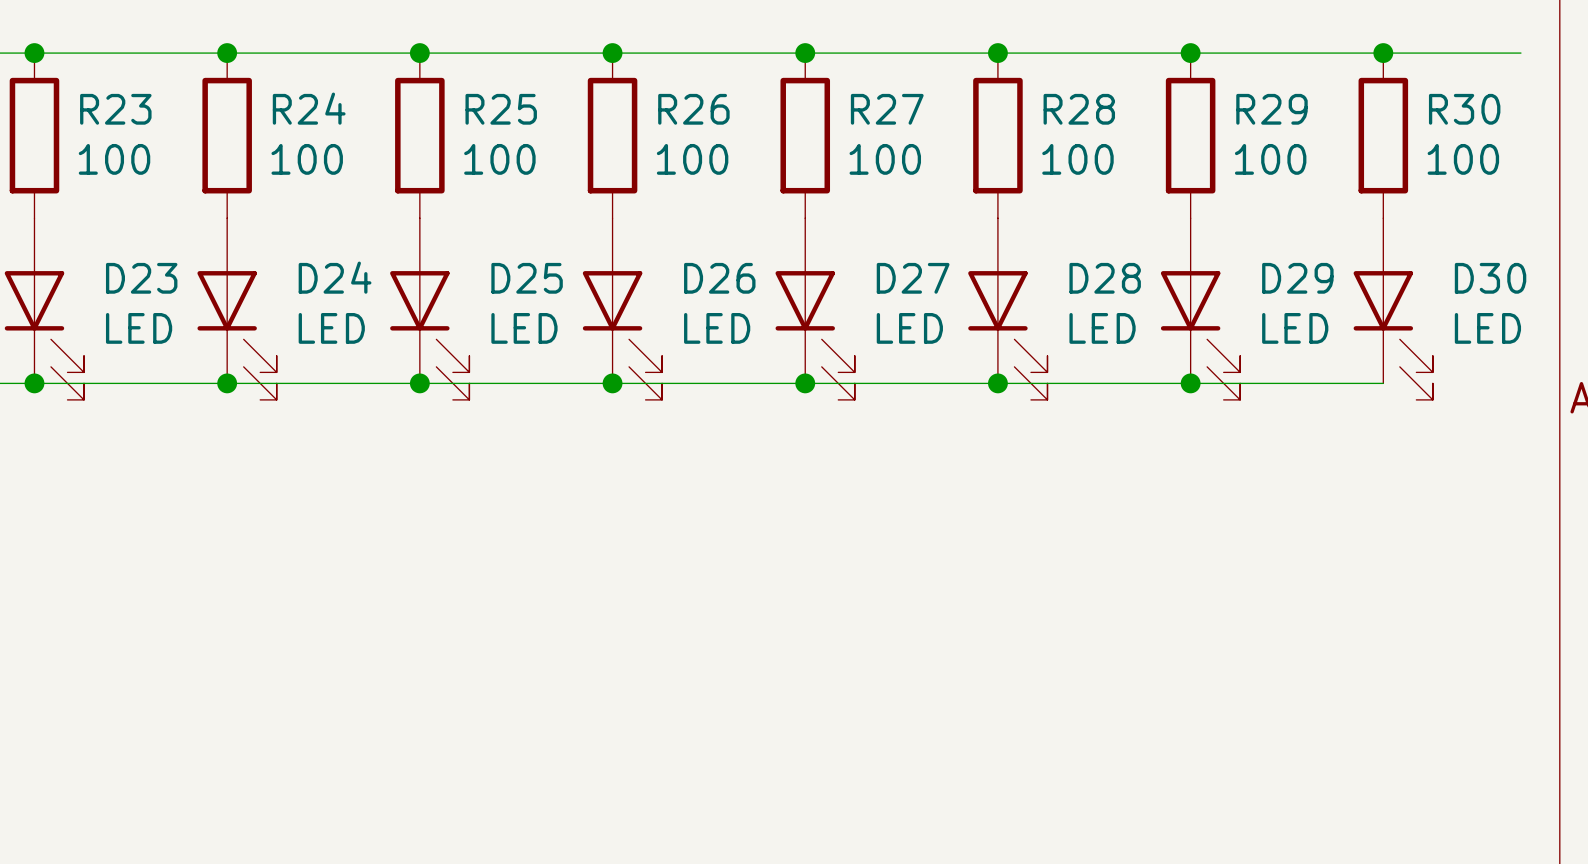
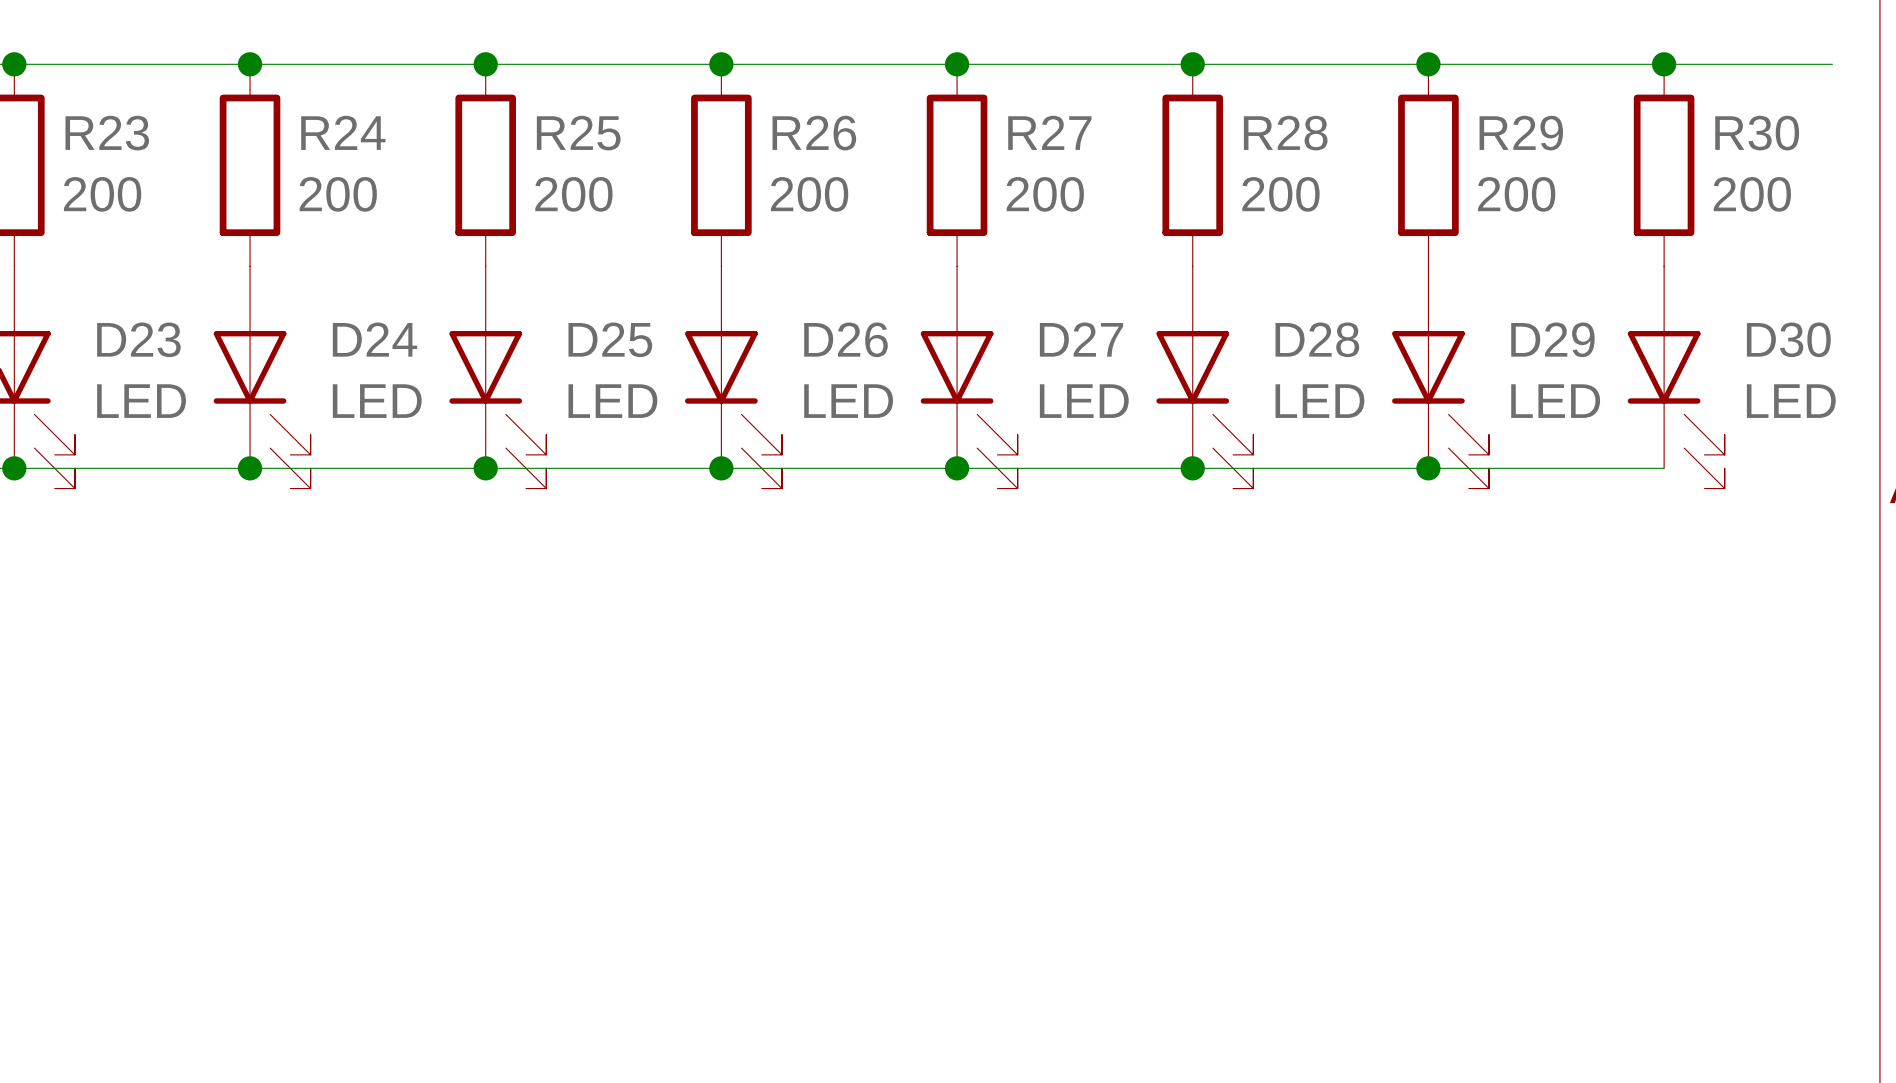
R23 value: 100 (114, 159) -> 200 (102, 194)
R24 value: 100 (307, 159) -> 200 (338, 194)
R25 value: 100 (499, 159) -> 200 (573, 194)
R26 value: 100 (692, 159) -> 200 (809, 194)
R27 value: 100 (885, 159) -> 200 (1045, 194)
R28 value: 100 (1077, 159) -> 200 (1280, 194)
R29 value: 100 (1270, 159) -> 200 (1516, 194)
R30 value: 100 (1463, 159) -> 200 (1752, 194)

